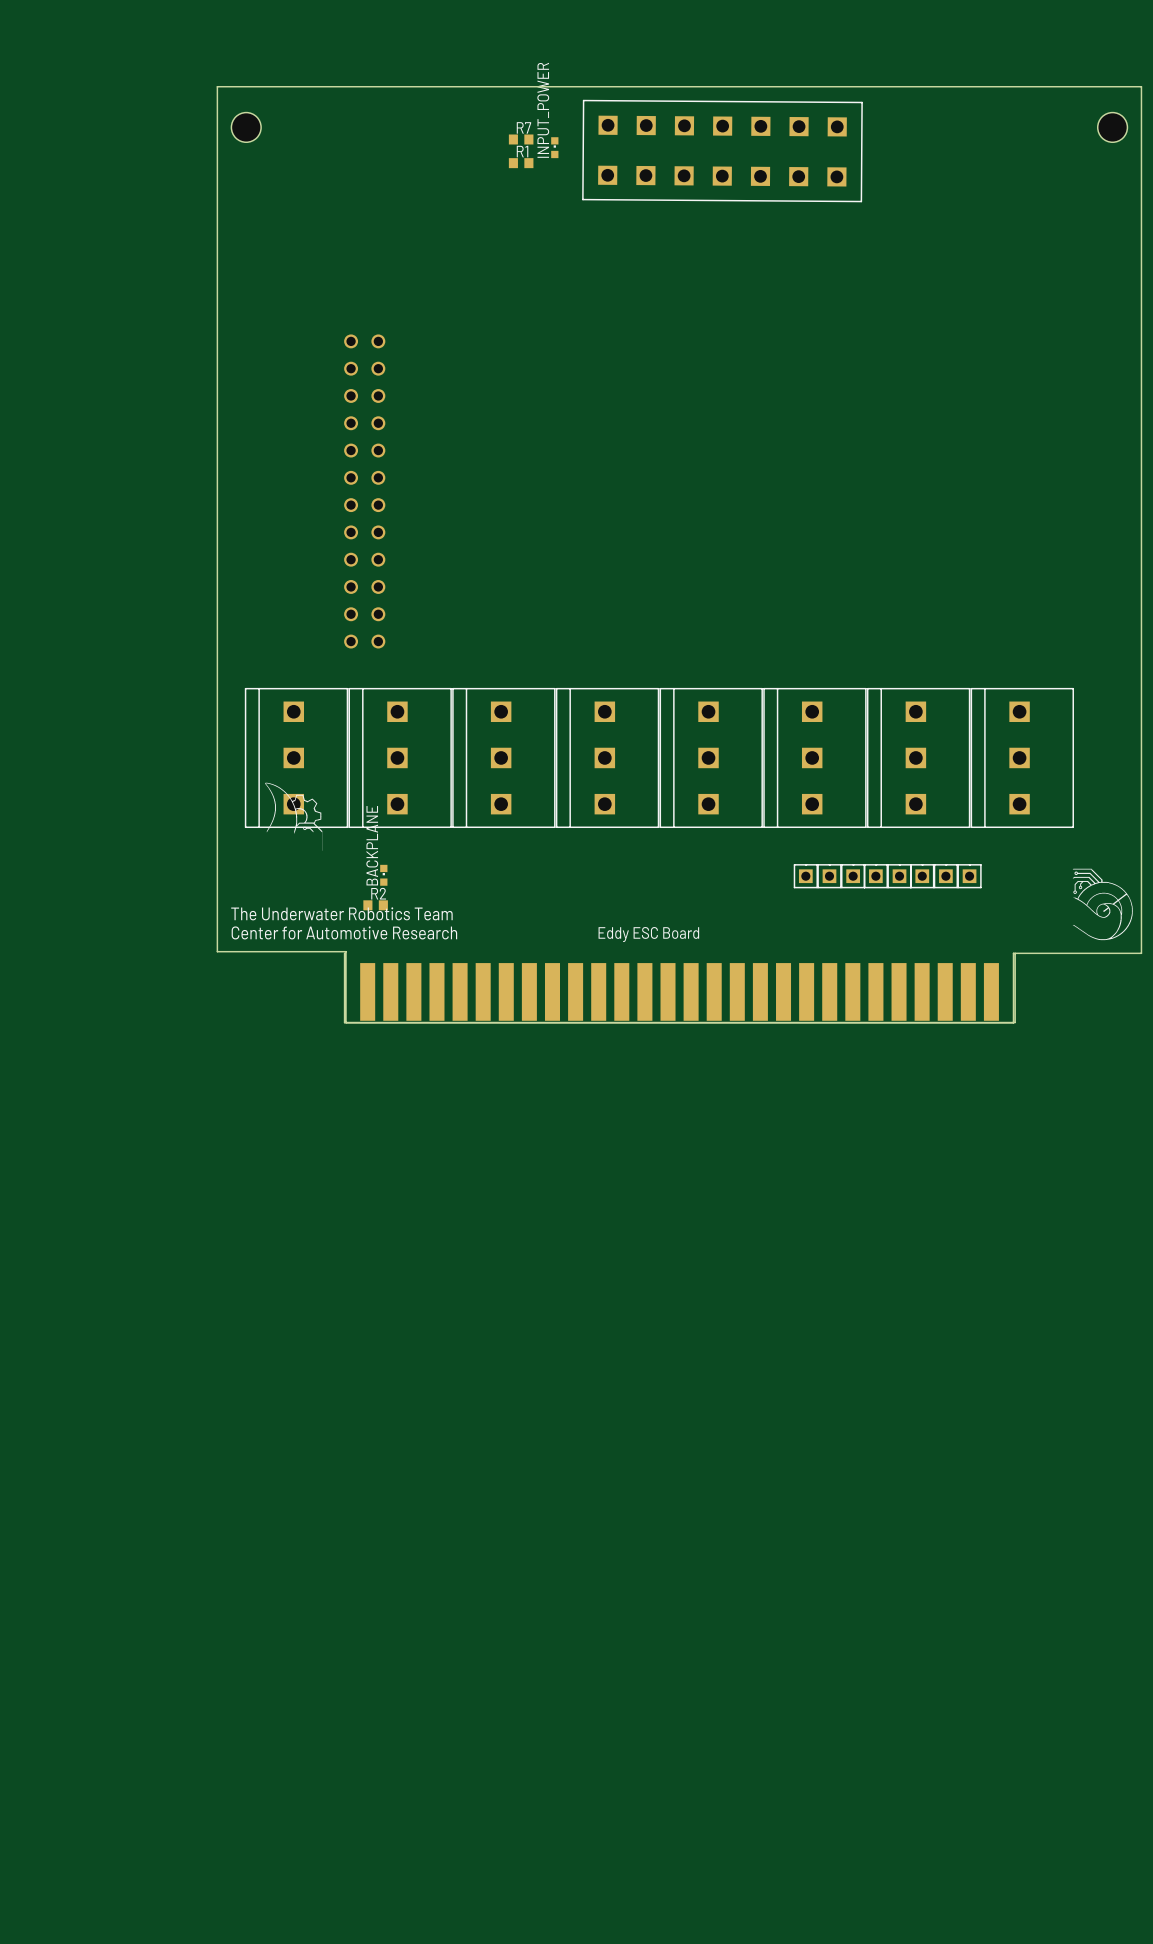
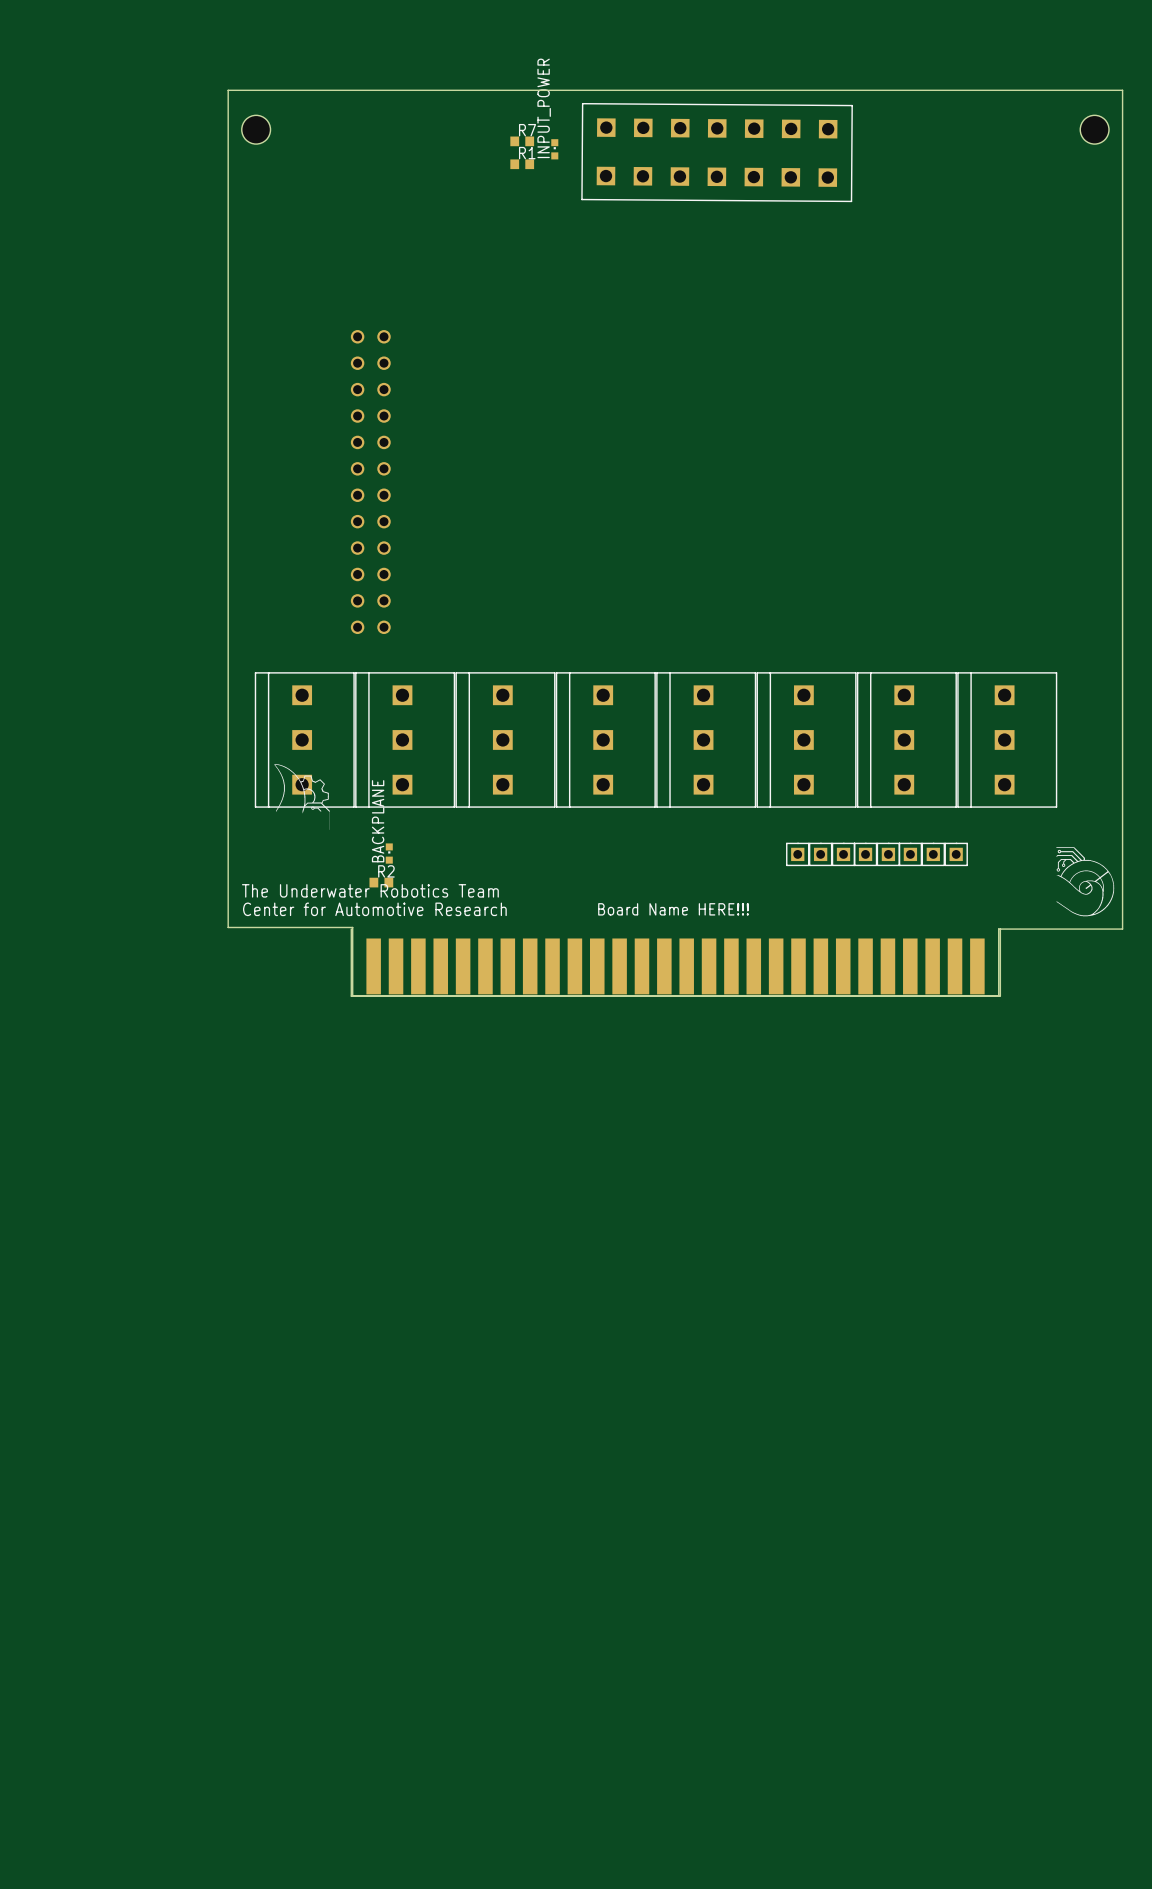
text: Eddy ESC Board (648, 934) -> Board Name HERE!!! (673, 909)

